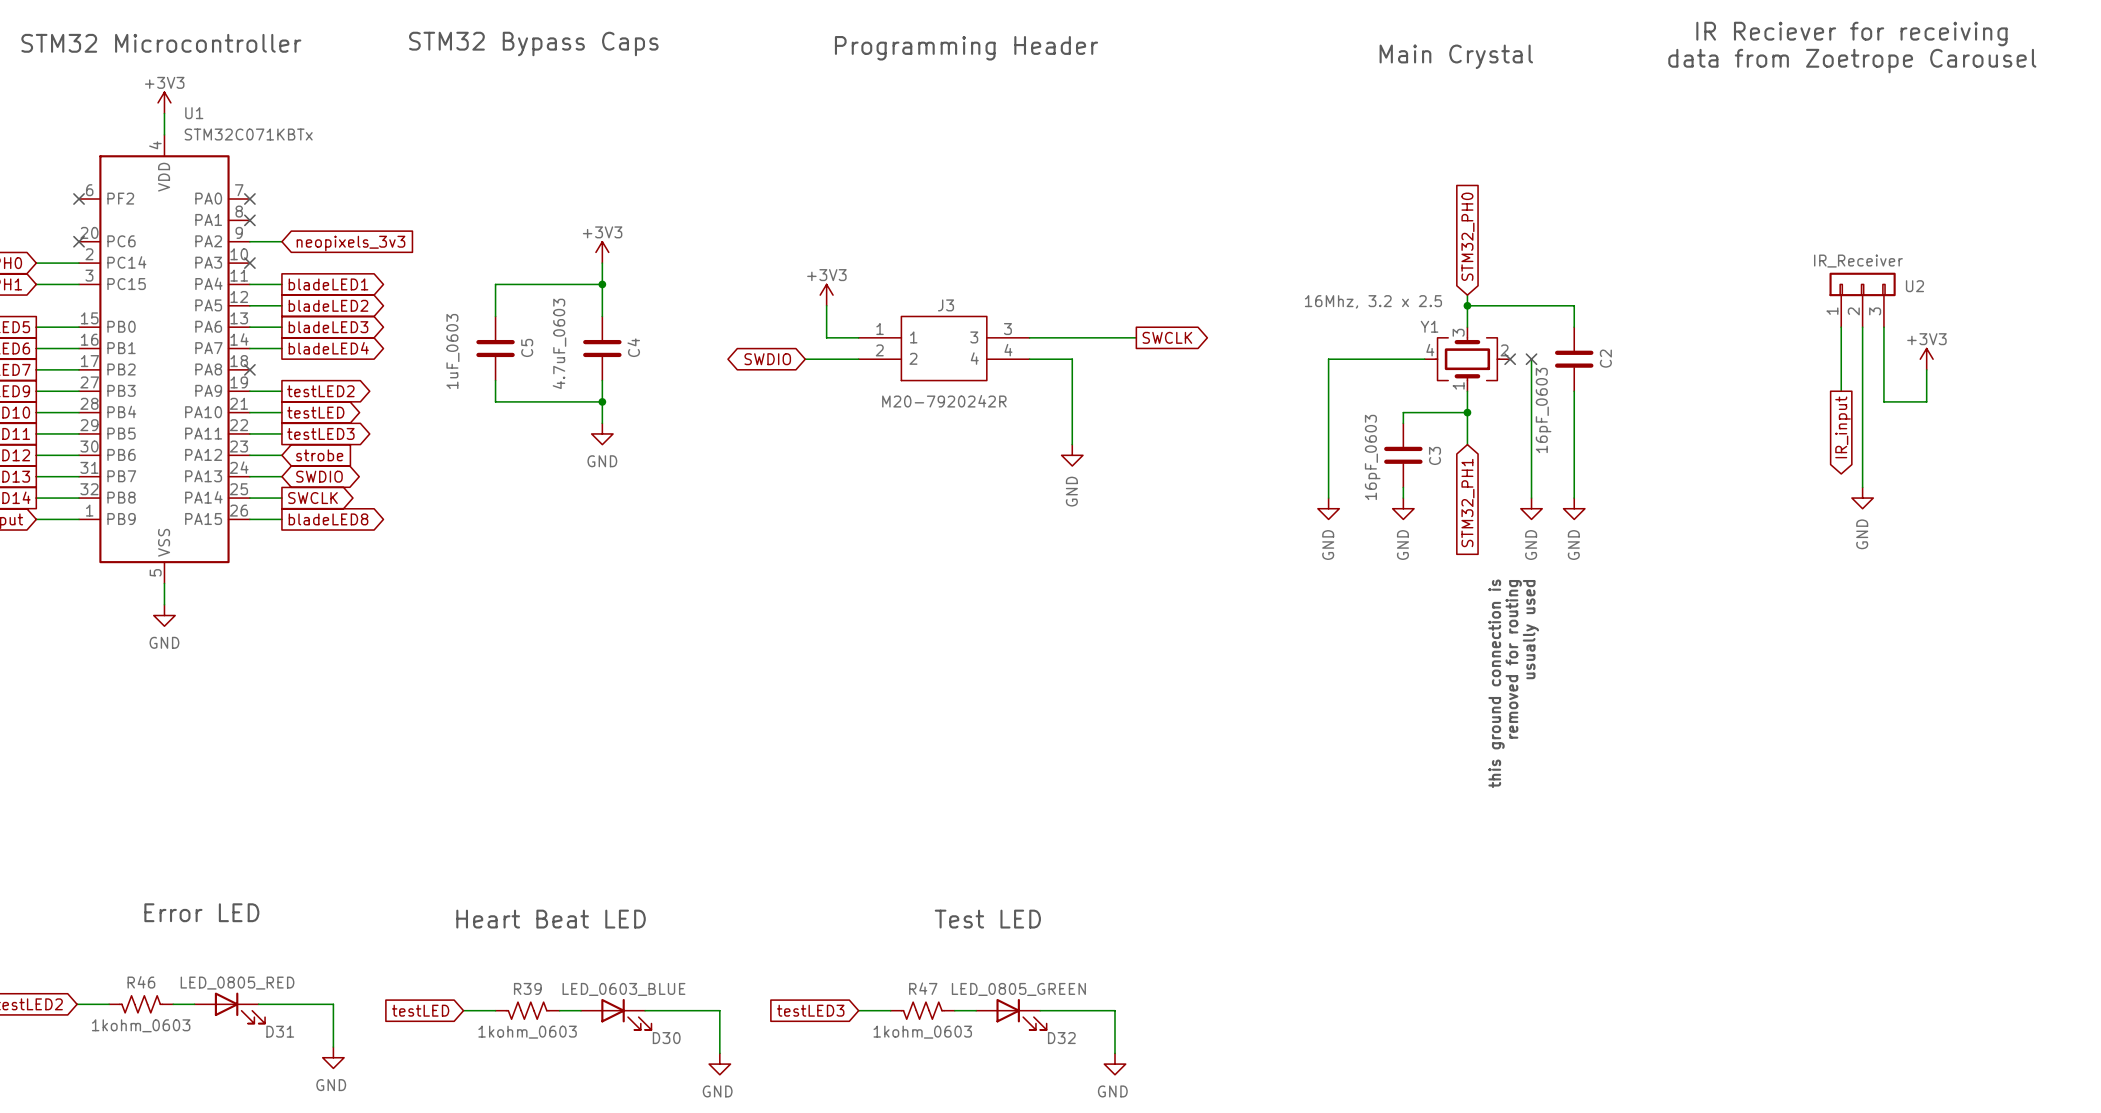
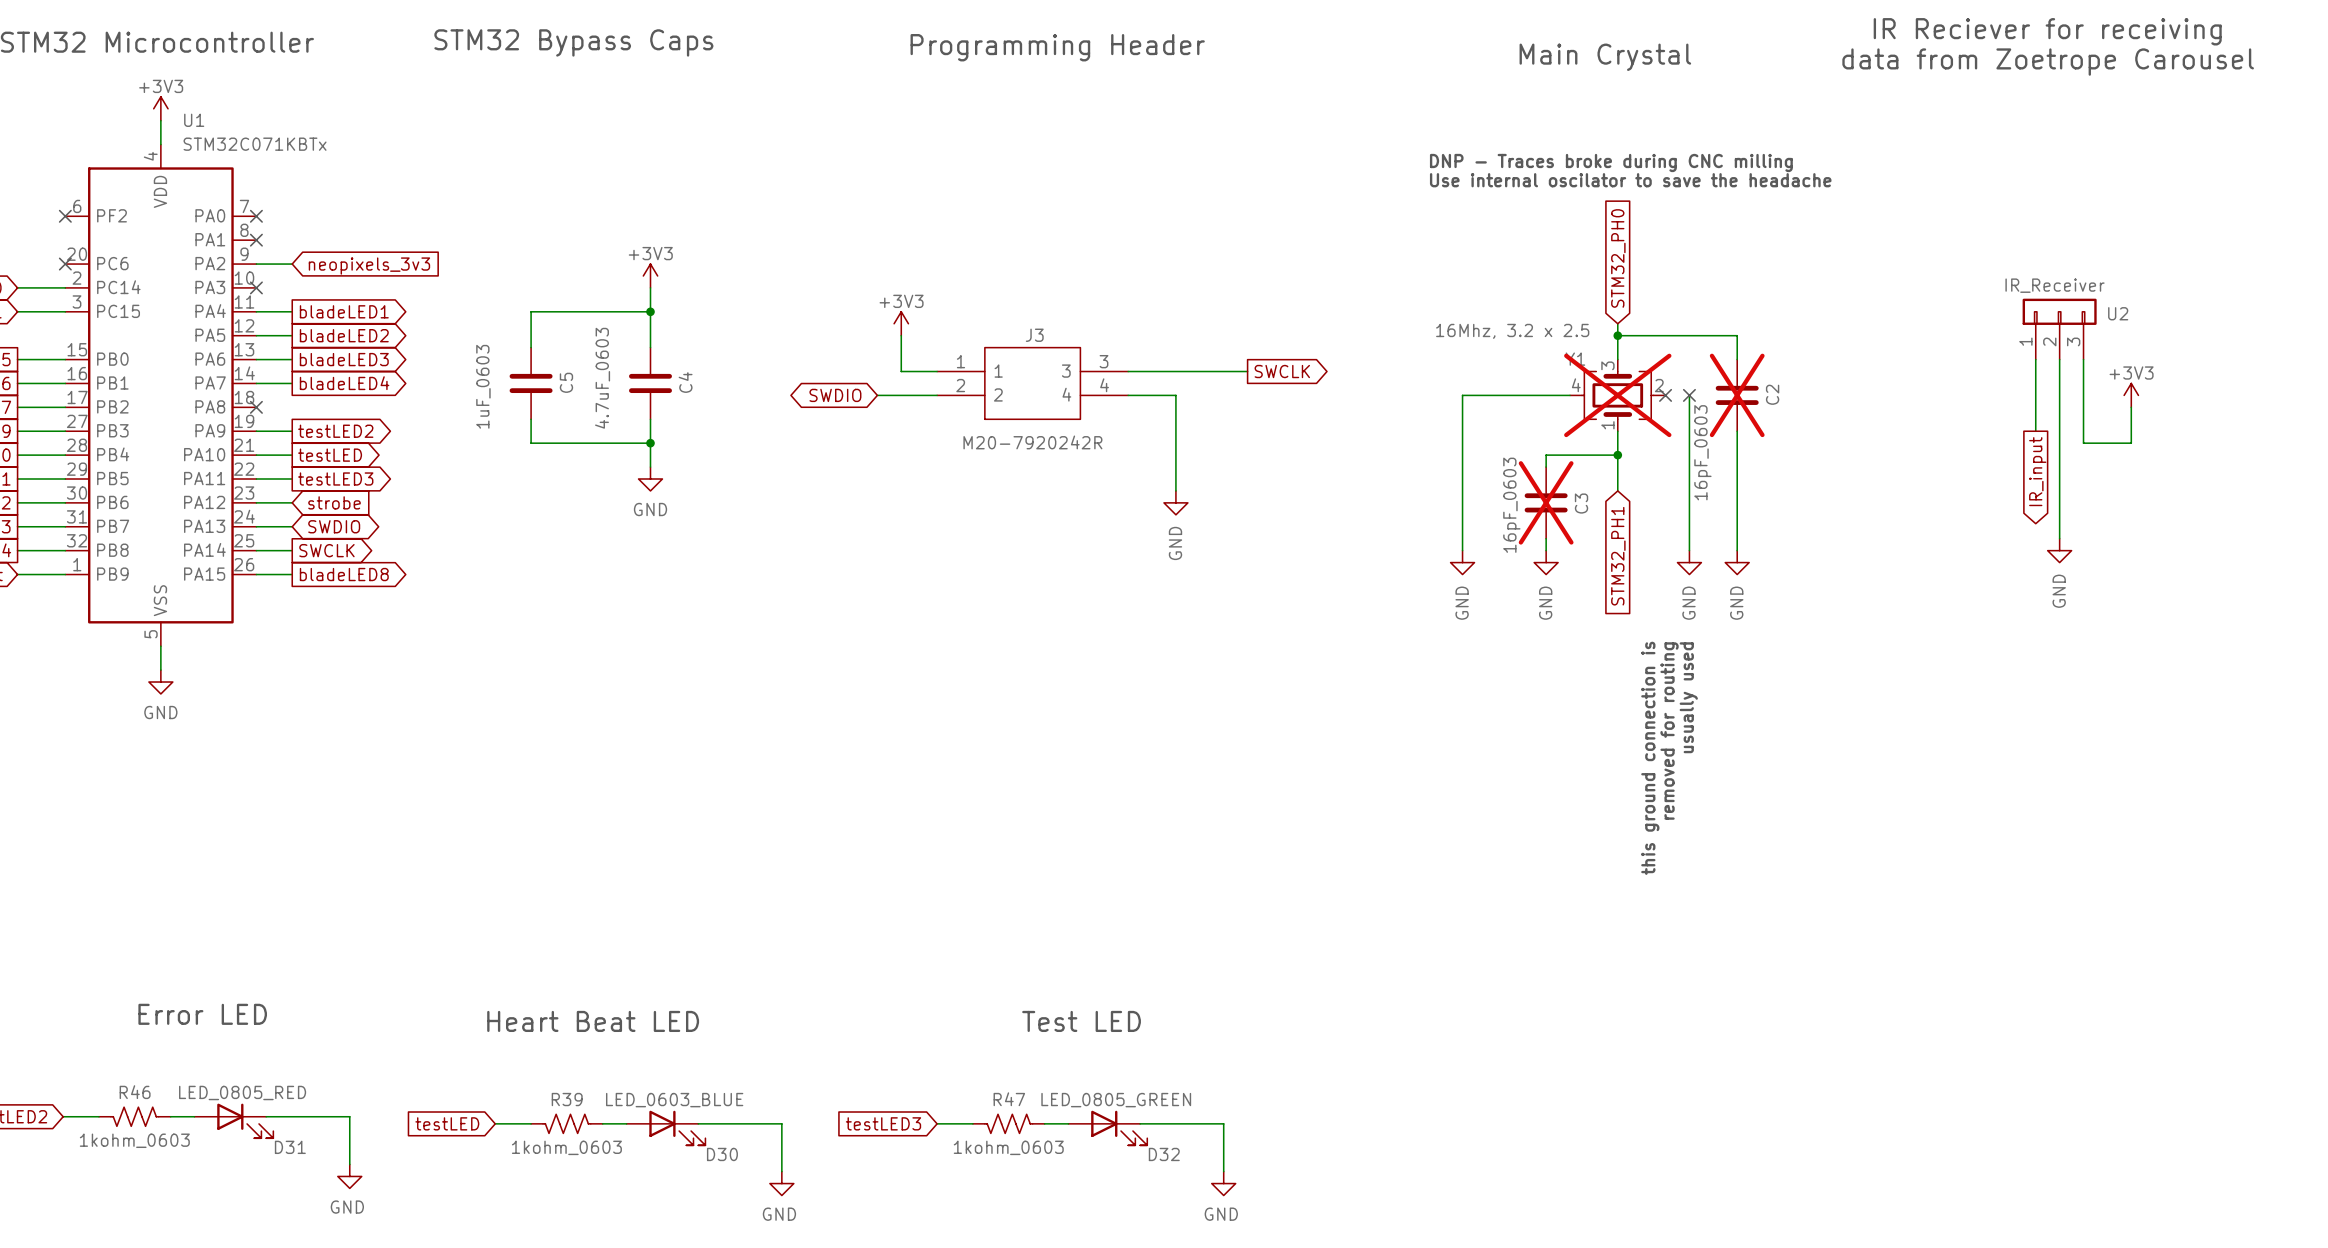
text: none -> DNP - Traces broke during CNC milling (1611, 162)
text: none -> Use internal oscilator to save the headache (1630, 180)
Y1 do-not-place cross: none -> (1617, 395)
C2 do-not-place cross: none -> (1737, 395)
C3 do-not-place cross: none -> (1546, 502)

